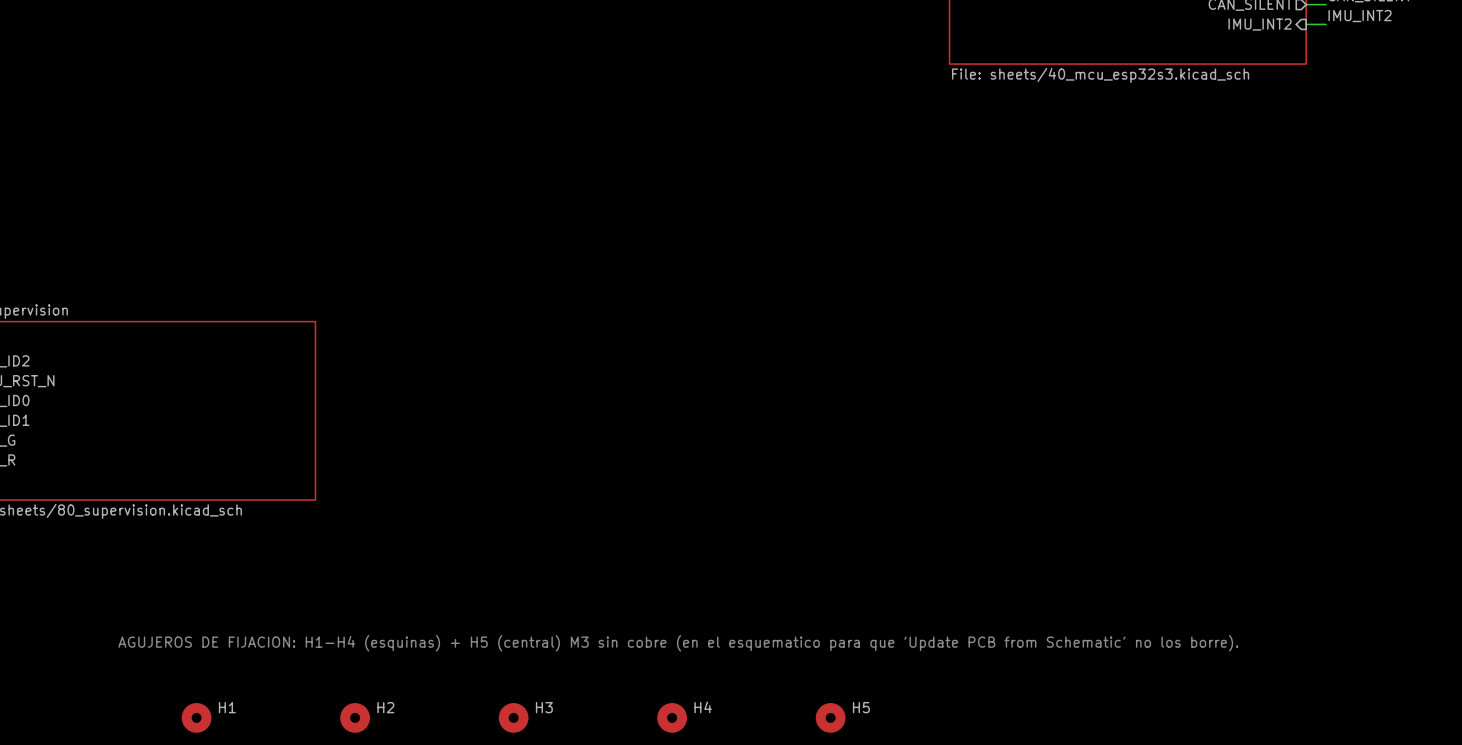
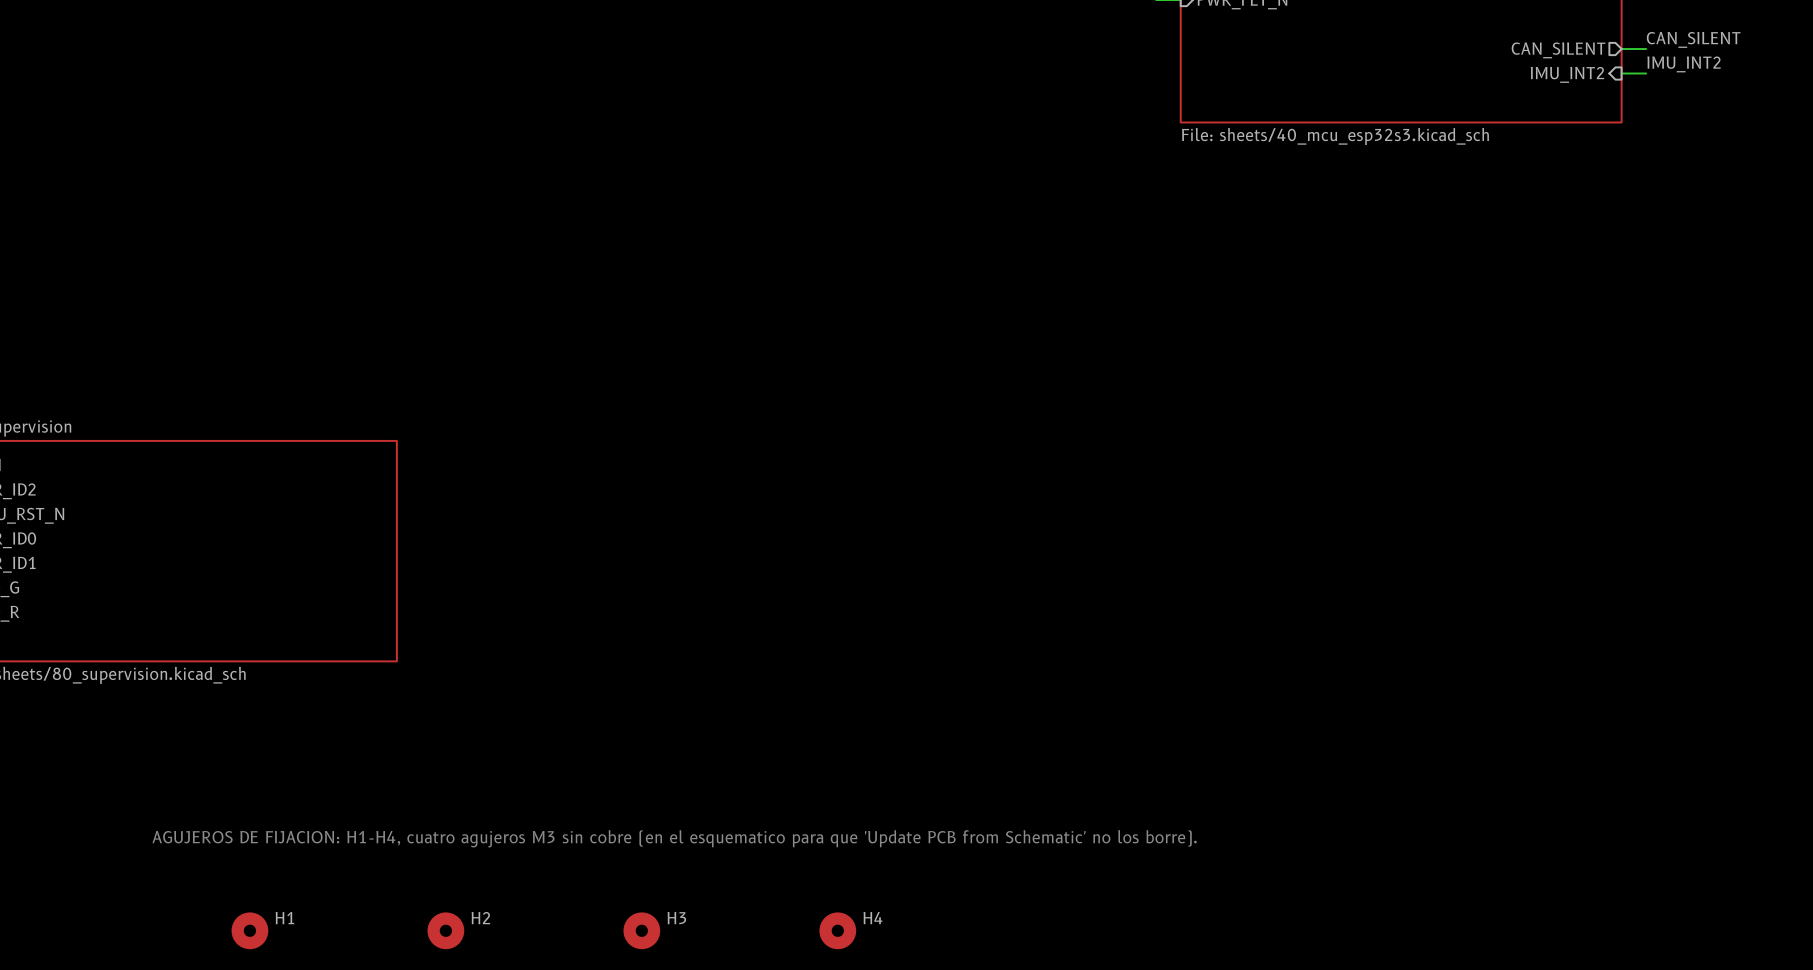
text: AGUJEROS DE FIJACION: H1-H4 (esquinas) + H5 (central) M3 sin cobre (en el esquematico para que 'Update PCB from Schematic' no los borre). (678, 643) -> AGUJEROS DE FIJACION: H1-H4, cuatro agujeros M3 sin cobre (en el esquematico para que 'Update PCB from Schematic' no los borre). (674, 838)
H5: (830, 717) -> none

